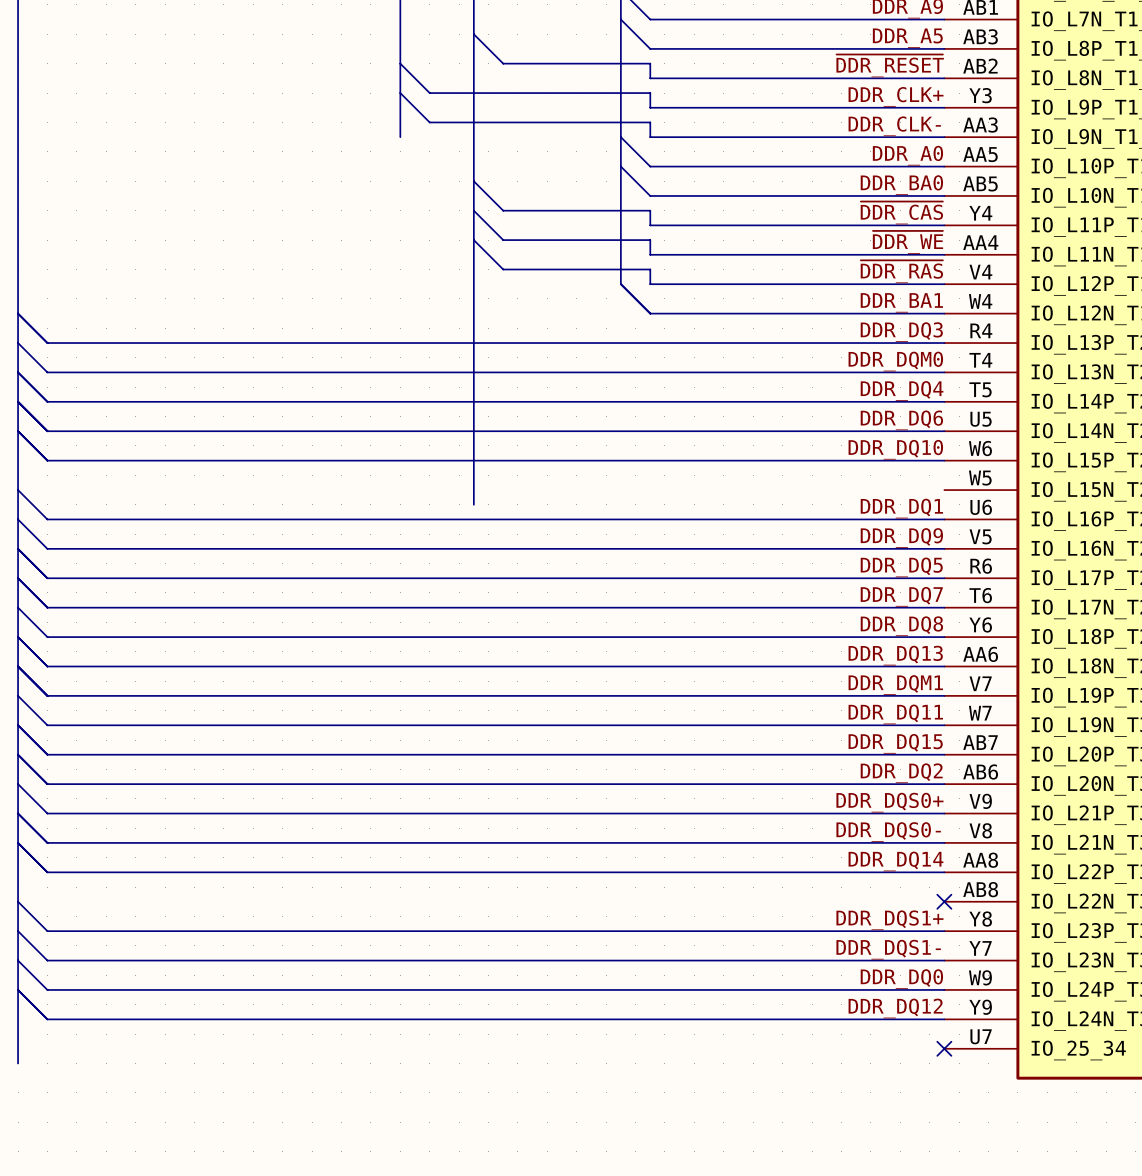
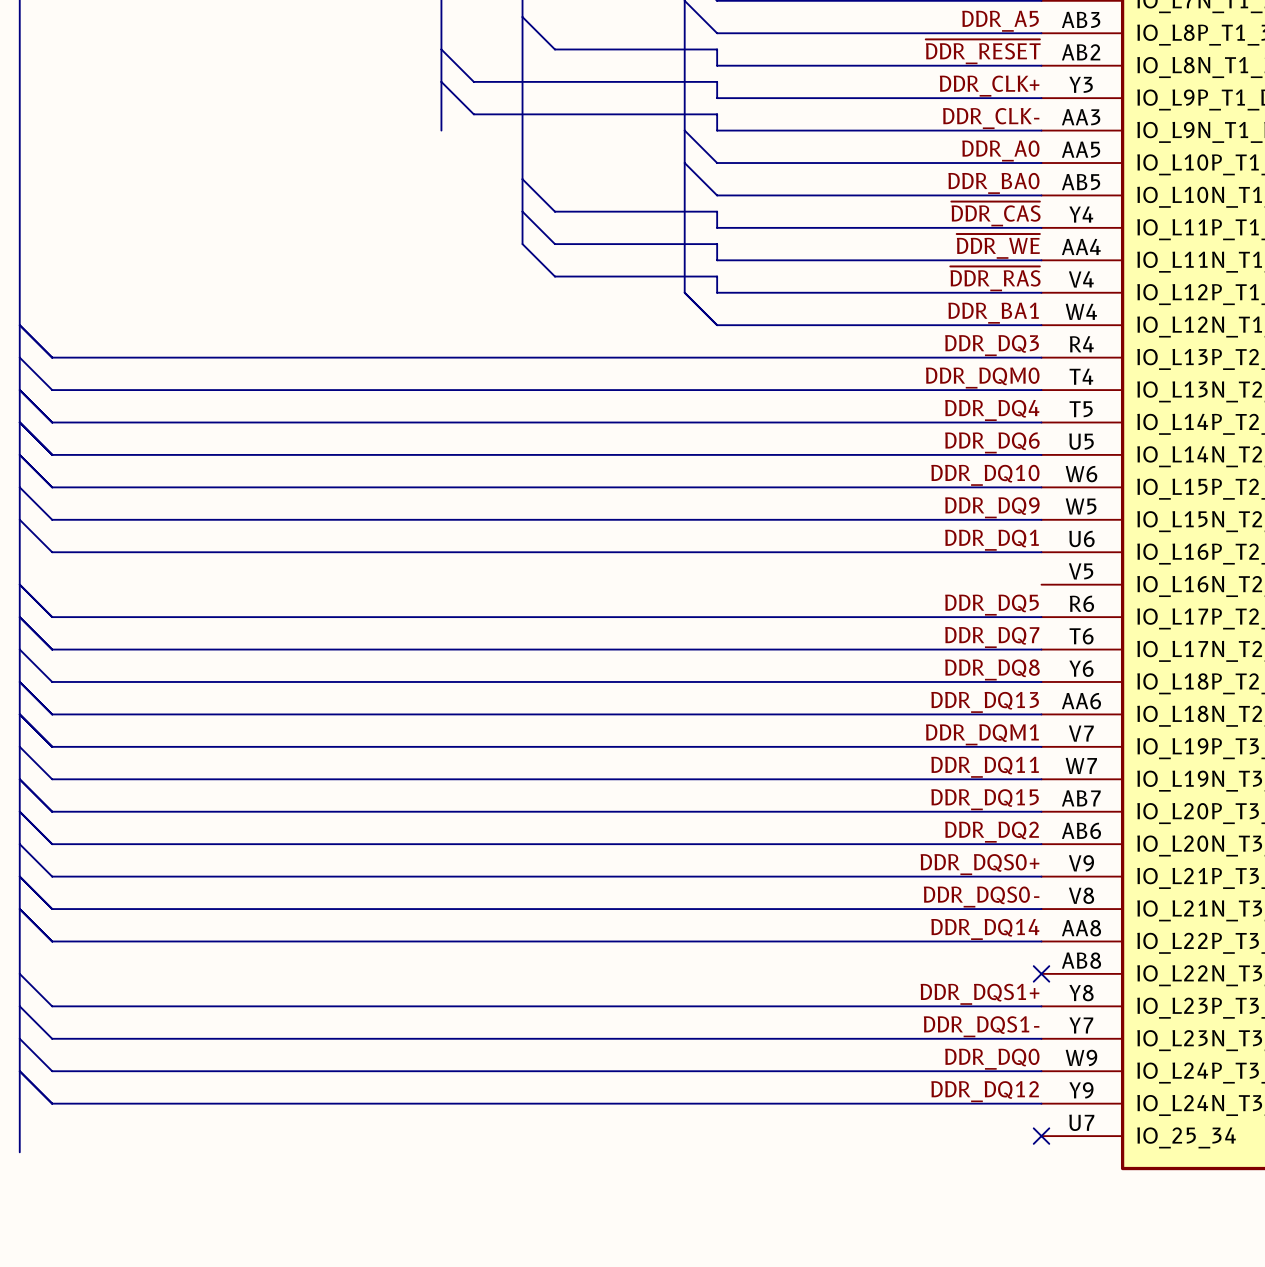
bus: (473, 240) (473, 504) -> none
wire: (18, 519) (47, 548) (944, 548) -> (19, 487) (52, 519) (1041, 519)
label position: DDR_DQ9 (901, 537) -> DDR_DQ9 (992, 507)

